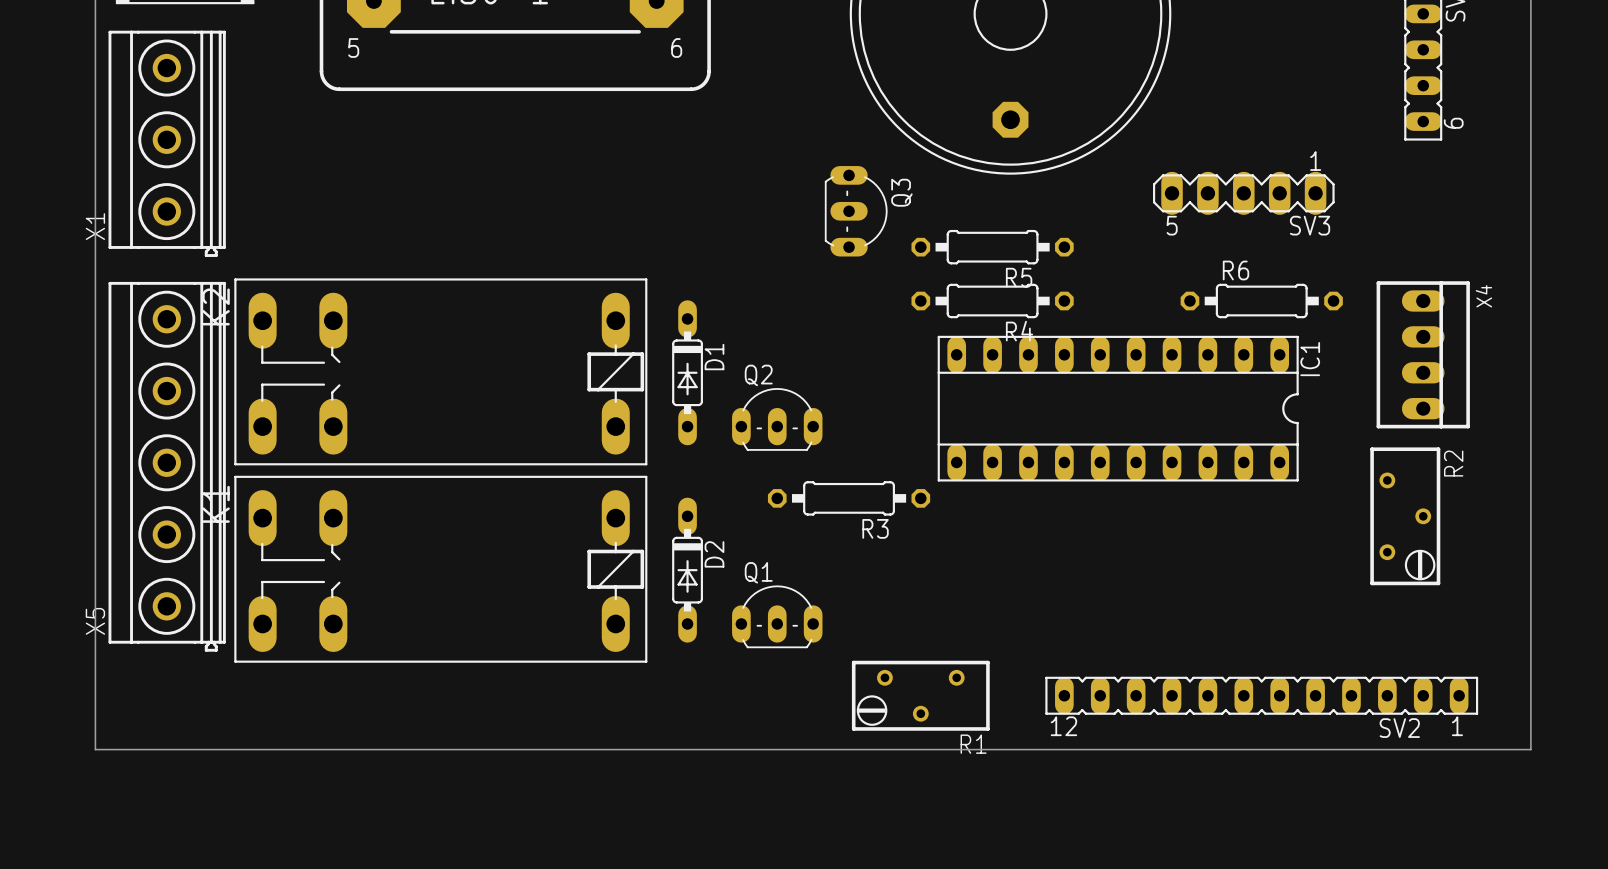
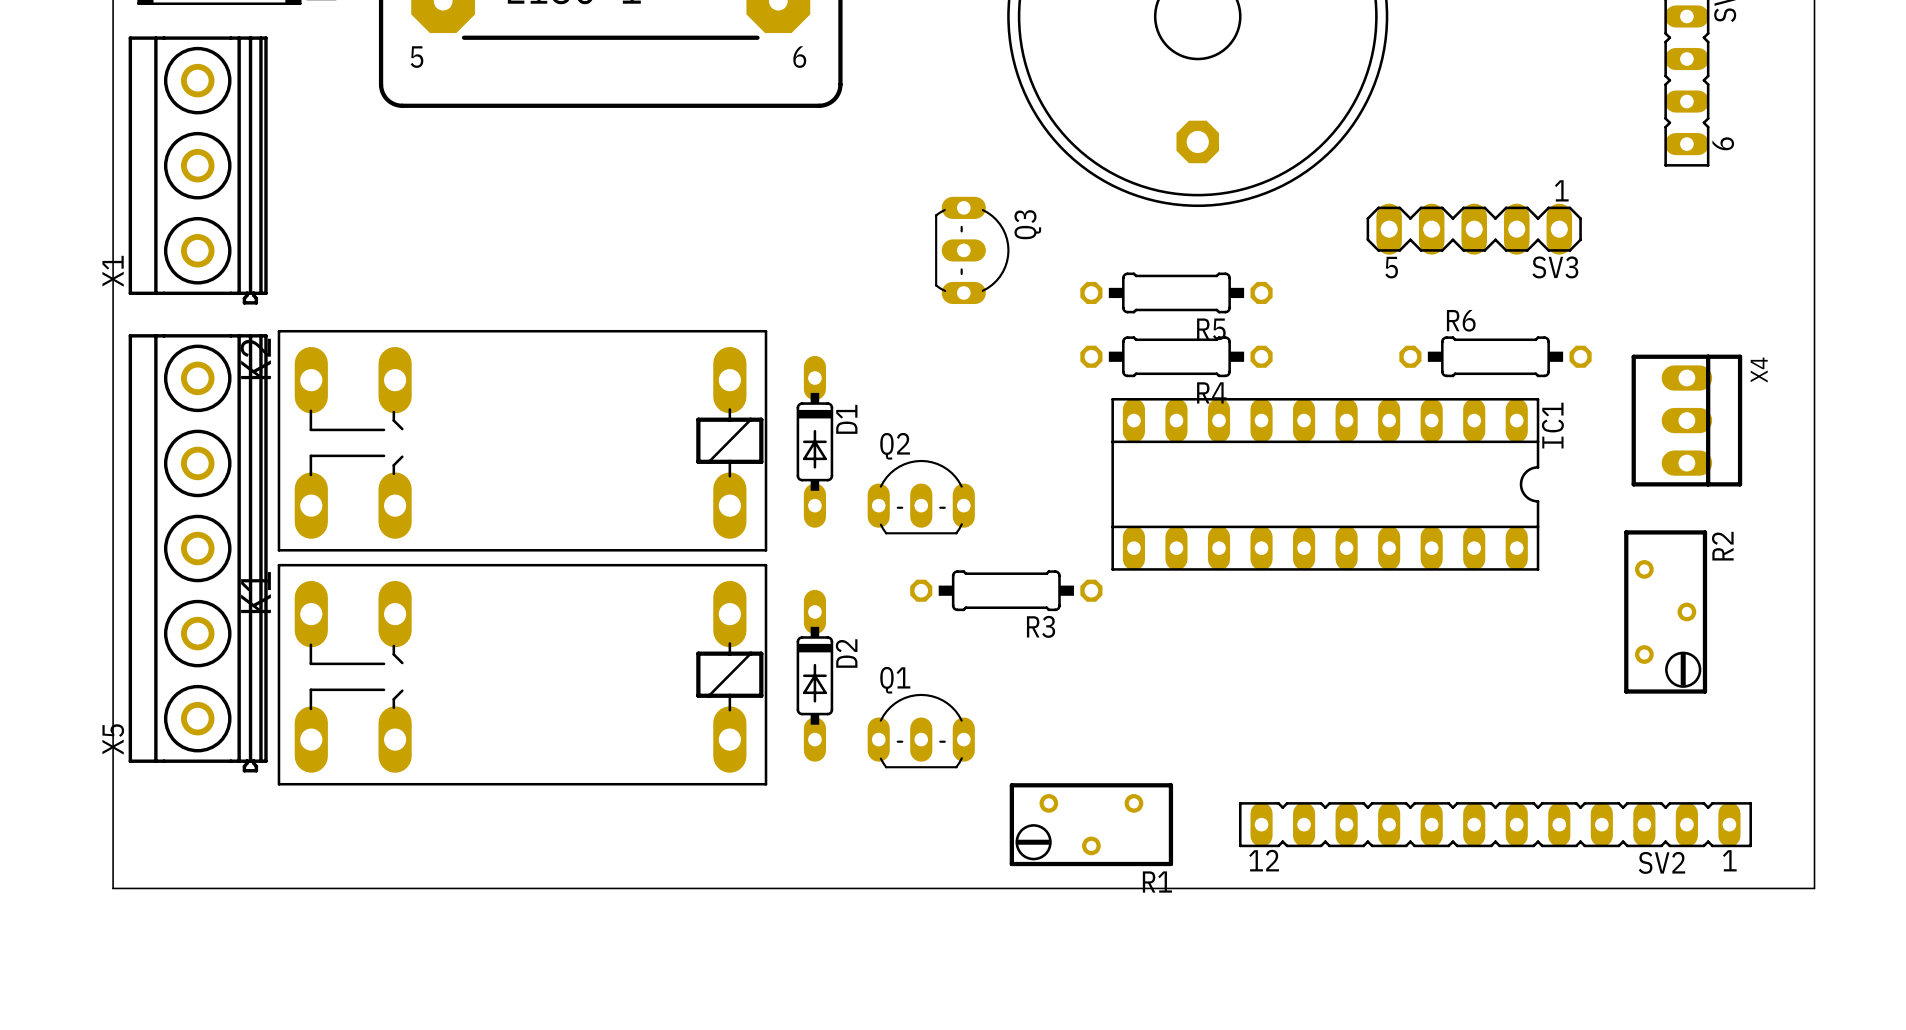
Q3 position: (856, 211) -> (972, 250)
X4 footprint: [1376, 281, 1470, 429] -> [1631, 354, 1743, 487]

